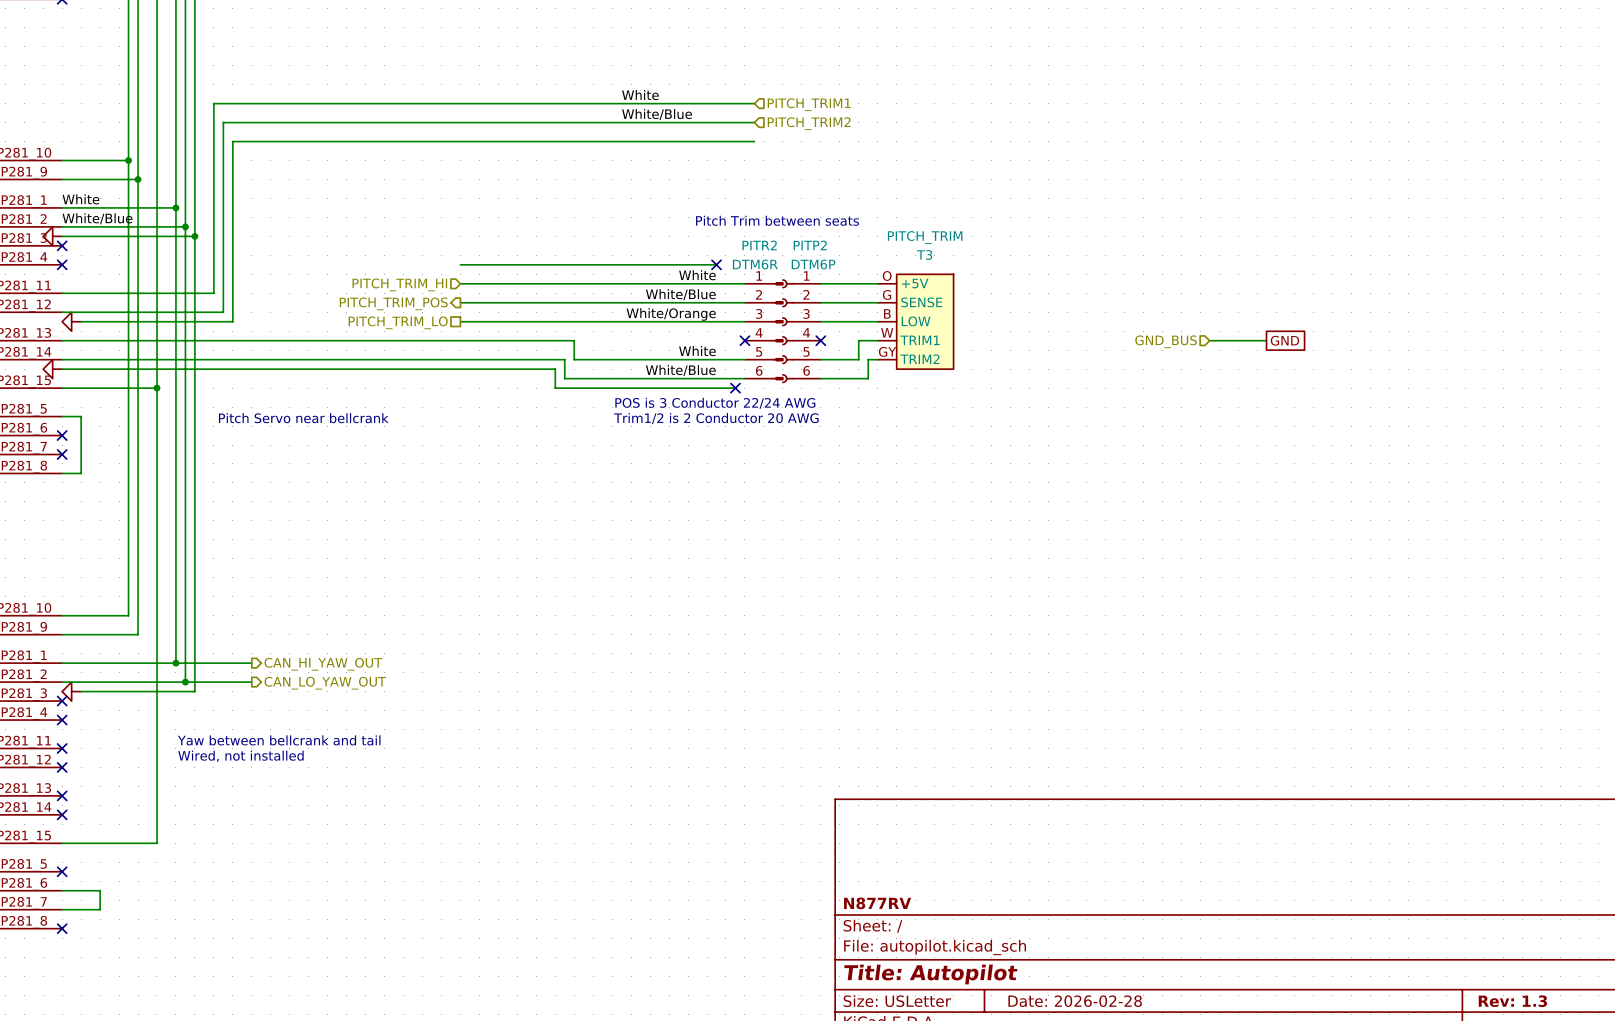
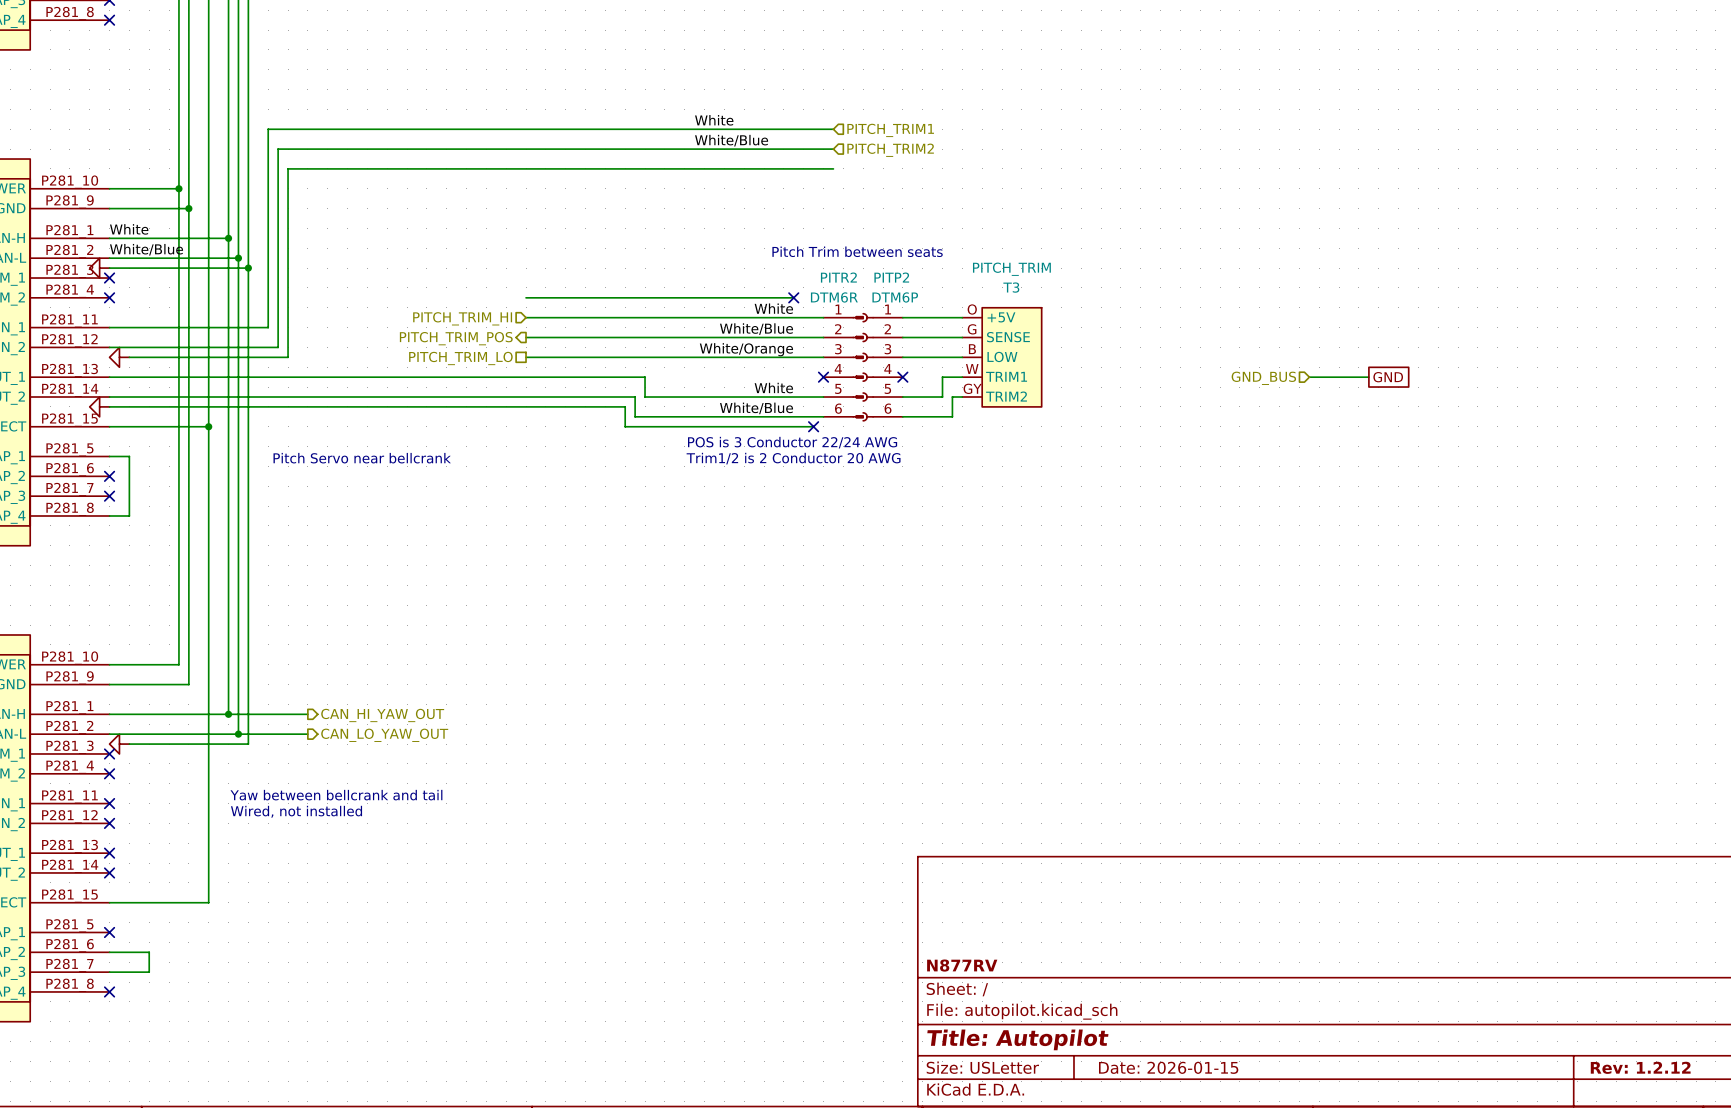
title block: Date: 2026-02-28 (1075, 1001) -> Date: 2026-01-15 (1168, 1067)
title block: Rev: 1.3 (1512, 1001) -> Rev: 1.2.12 (1640, 1067)

